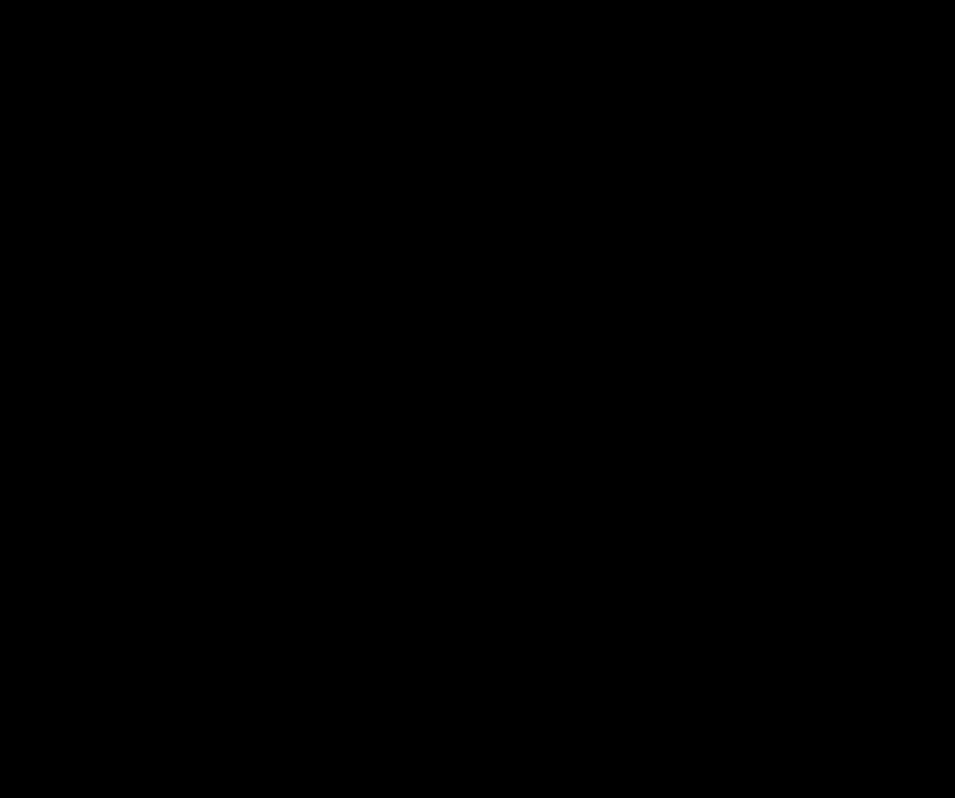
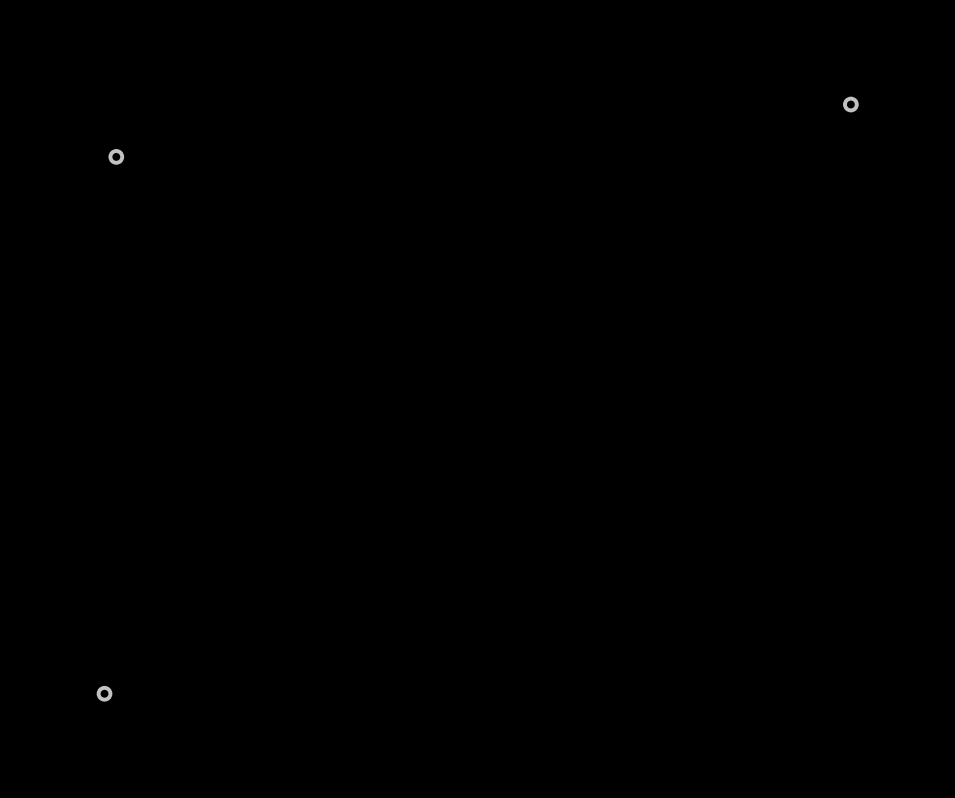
via: none -> (850, 104)
via: none -> (116, 156)
via: none -> (104, 693)

